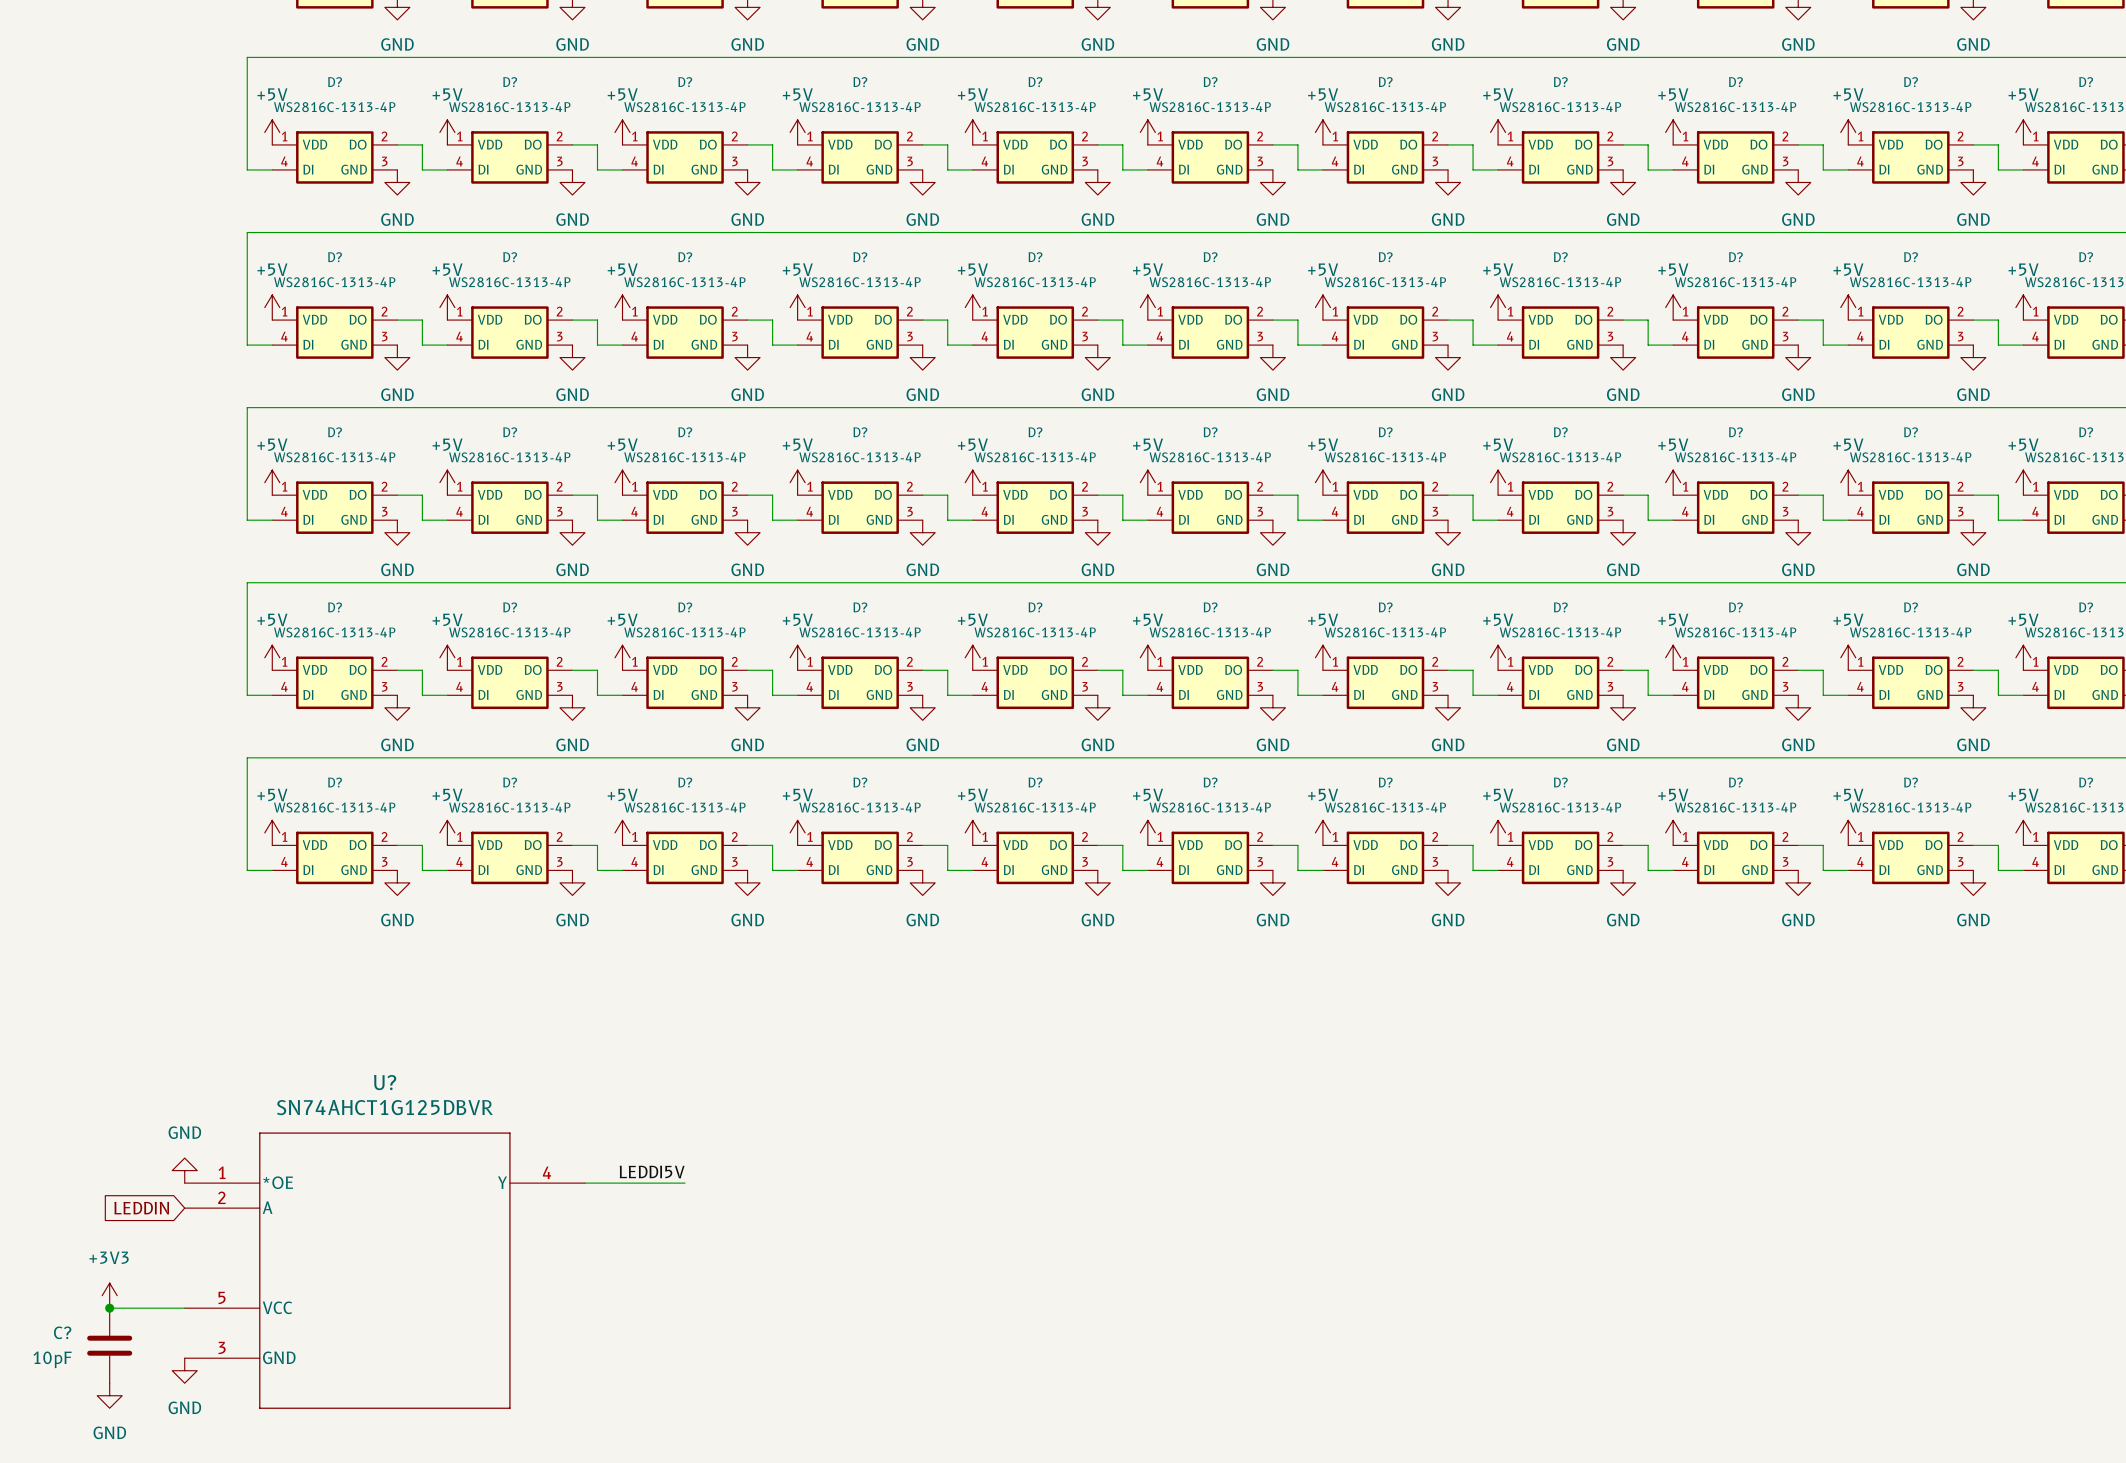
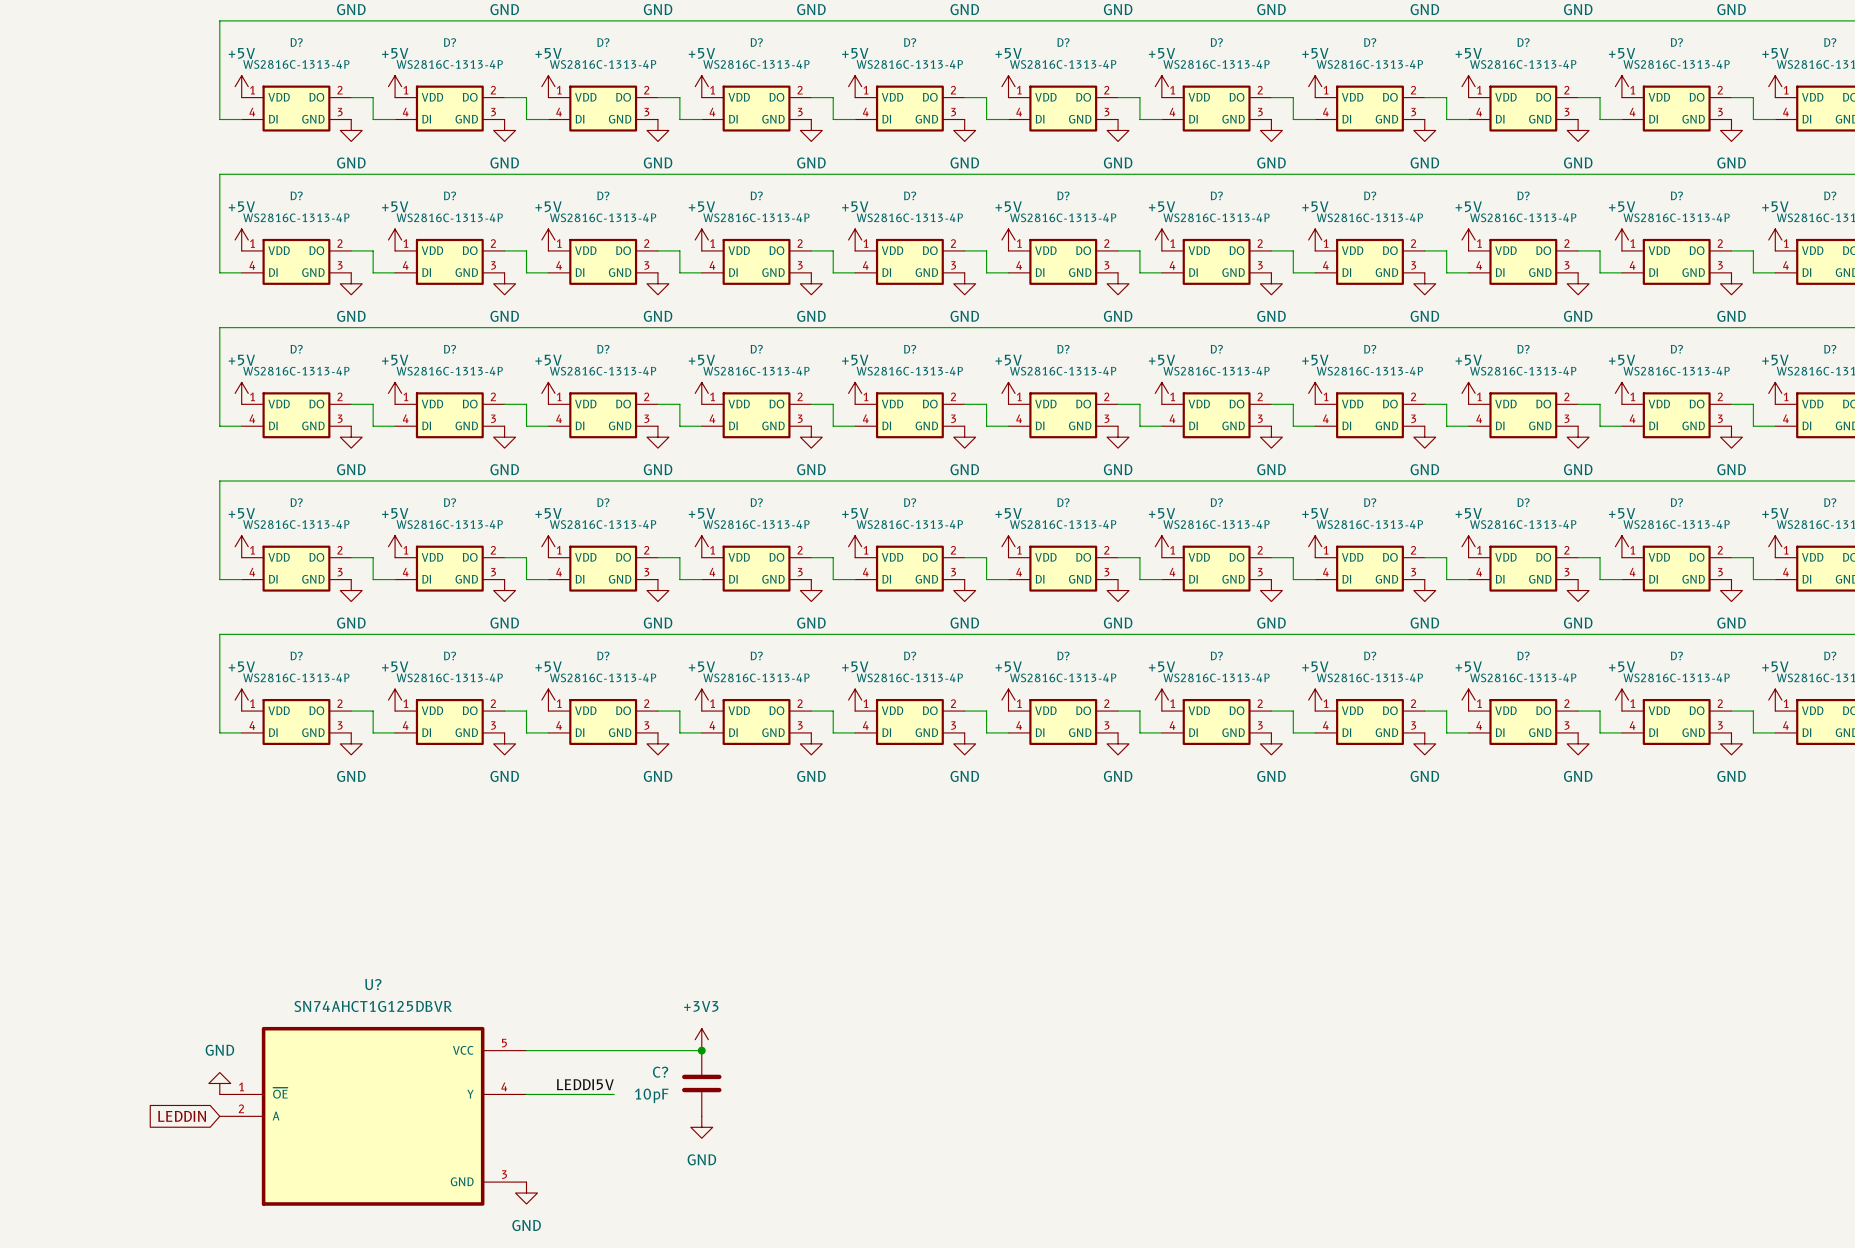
power symbol: GND (184, 1170) -> none
label position: LEDDI5V (652, 1172) -> LEDDI5V (585, 1084)
wire: (584, 1183) (685, 1183) -> (526, 1094) (614, 1094)
global label position: LEDDIN (141, 1208) -> LEDDIN (182, 1116)
power symbol: none -> +3V3 (701, 1039)
wire: none -> (526, 1050) (701, 1050)
junction: none -> (701, 1050)
power symbol: none -> GND (219, 1083)
U?: SN74AHCT1G125DBVR (384, 1270) -> none
C?: none -> 10pF (701, 1083)
power symbol: +3V3 (109, 1295) -> none
wire: (109, 1308) (184, 1308) -> none
junction: (109, 1308) -> none
U?: none -> SN74AHCT1G125DBVR (373, 1116)
power symbol: none -> GND (701, 1127)
C?: 10pF (109, 1345) -> none
power symbol: GND (184, 1370) -> none
power symbol: GND (109, 1395) -> none
power symbol: none -> GND (526, 1193)

